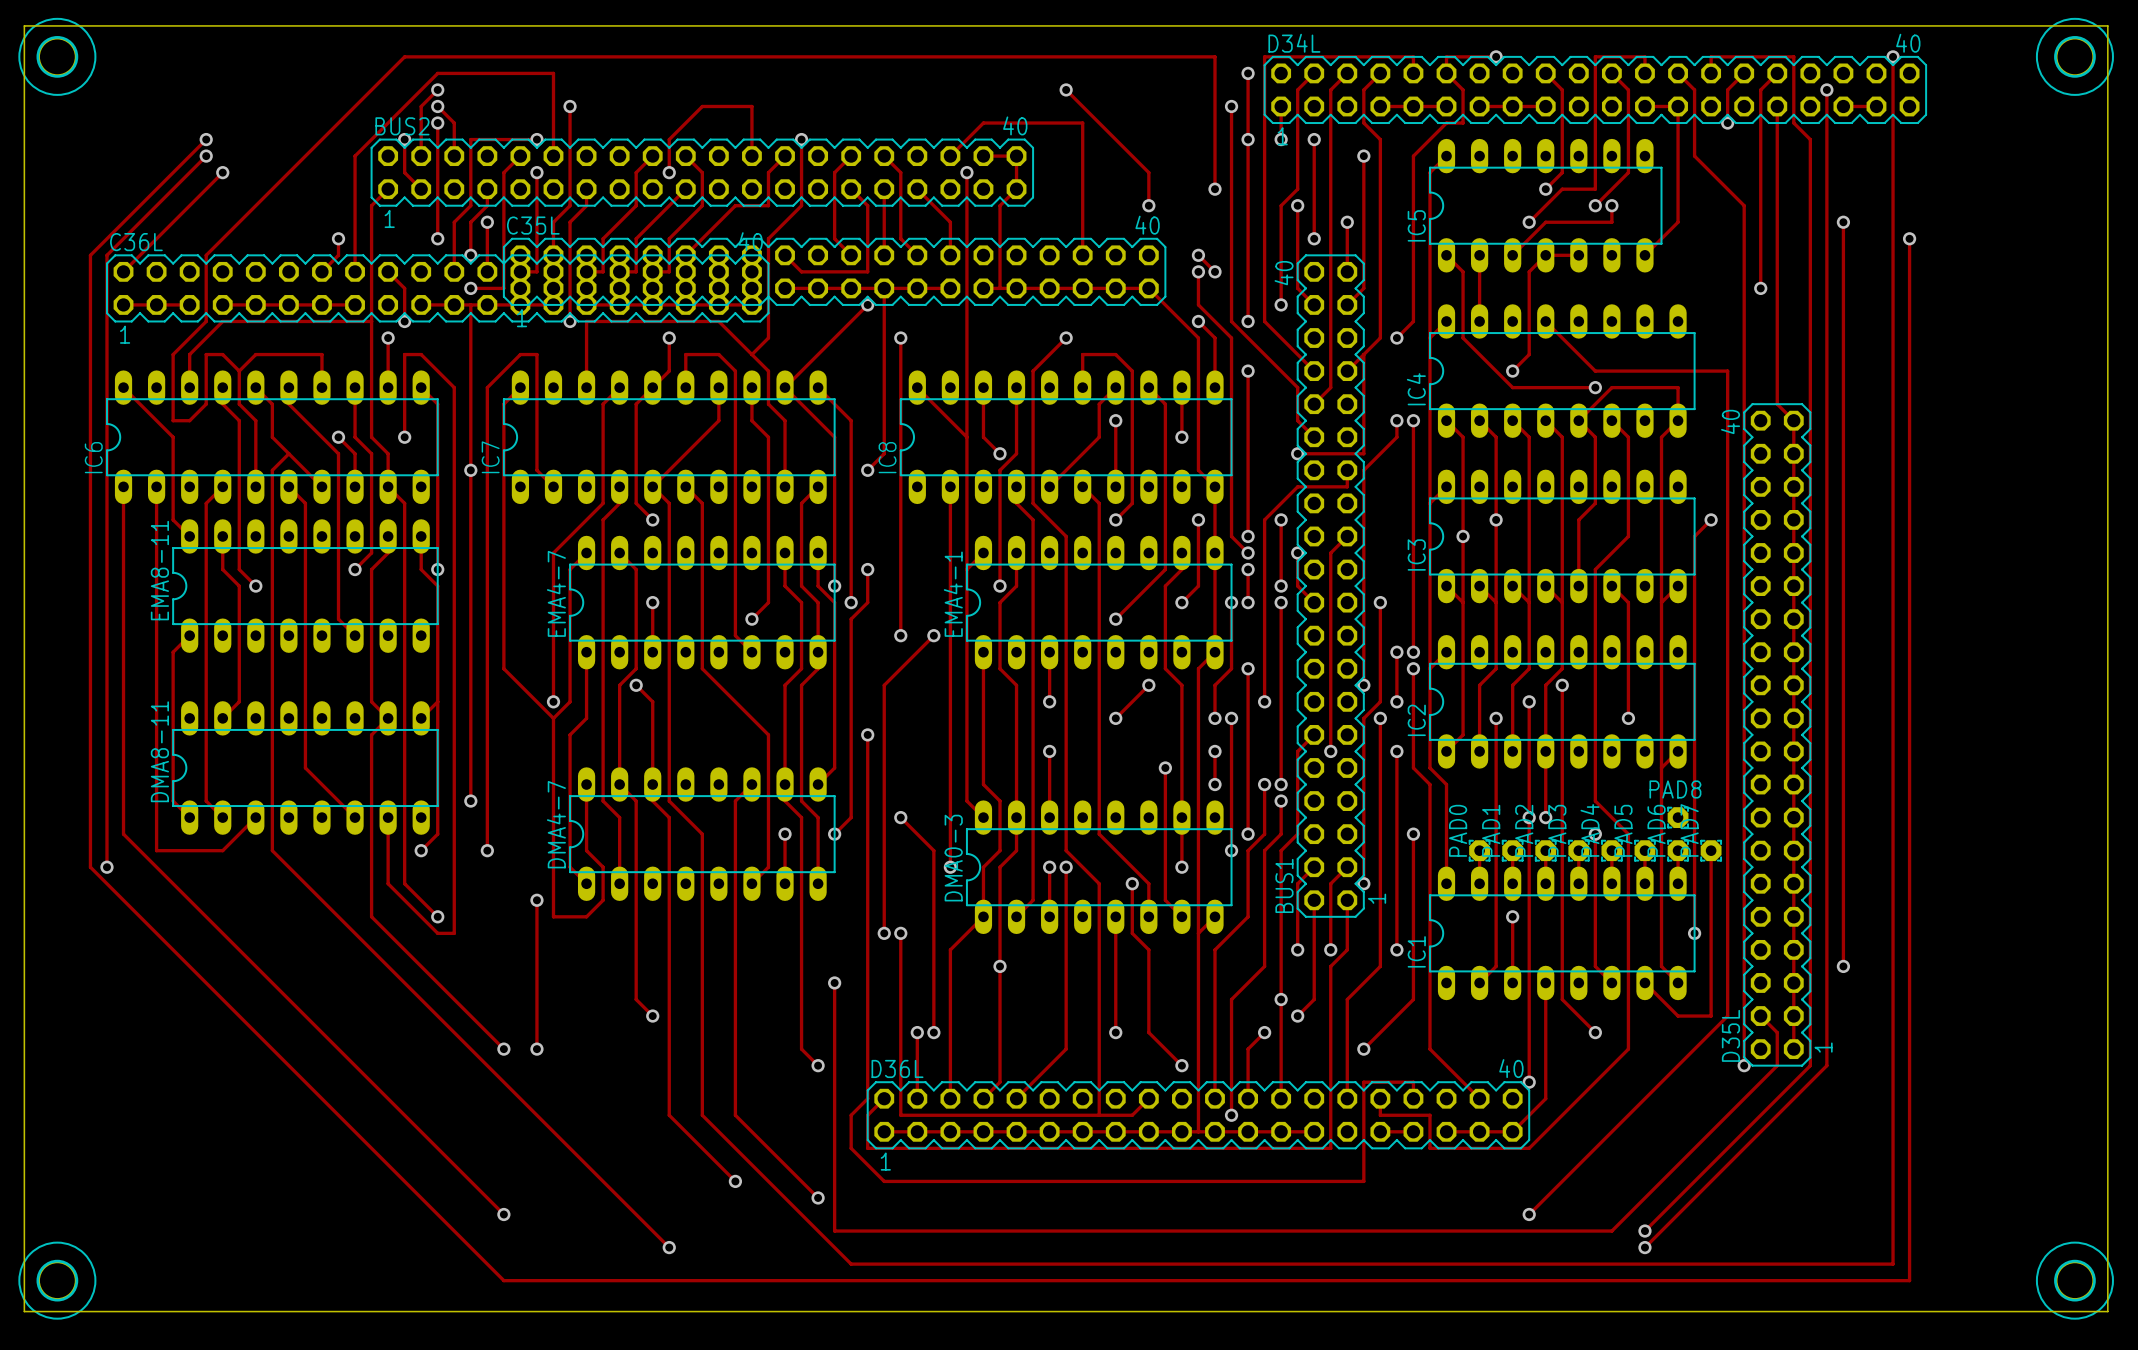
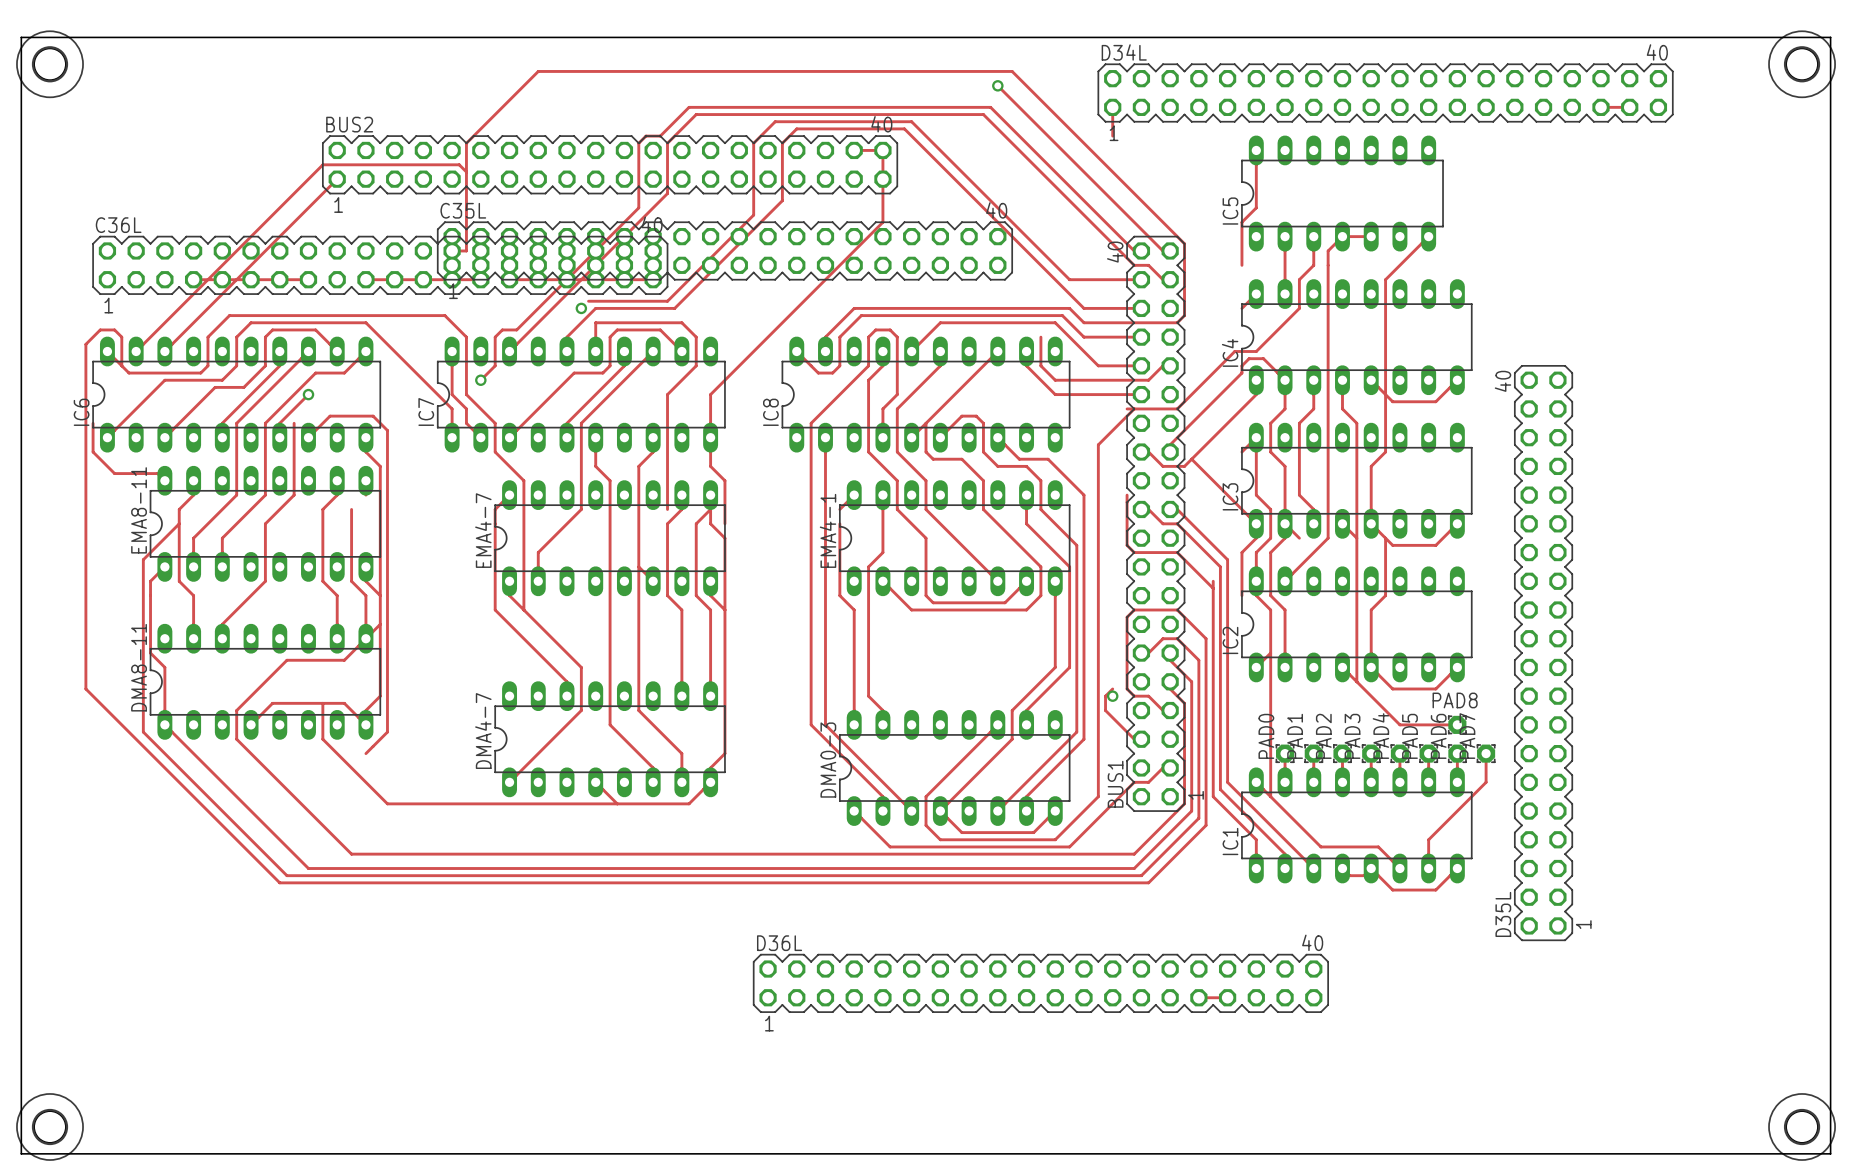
track: (1496, 56) (1446, 56) (1446, 73) (1463, 89) (1463, 123) (1446, 123) (1413, 156) (1413, 321) (1396, 338) -> none
via: (1496, 56) -> none
track: (1893, 56) (1893, 1264) (851, 1264) (702, 1115) (702, 834) (669, 801) -> (509, 782) (581, 710)
via: (1893, 56) -> none
track: (1248, 73) (1248, 321) -> none
via: (1248, 73) -> none
track: (1314, 73) (1297, 89) (1297, 189) (1281, 205) (1281, 304) -> none
track: (1347, 73) (1330, 89) (1330, 387) (1314, 404) -> (969, 322) (1055, 322) (1098, 365) (1141, 365)
track: (1380, 73) (1363, 89) (1363, 123) (1380, 139) (1380, 338) (1347, 371) -> none
track: (1413, 73) (1413, 56) (1264, 56) (1264, 321) (1314, 371) -> none
track: (1545, 73) (1562, 89) (1562, 172) (1545, 189) -> none
track: (1611, 73) (1628, 89) (1628, 172) (1595, 205) -> none
track: (1644, 73) (1644, 56) (1595, 56) (1595, 189) (1562, 189) (1529, 222) -> none
track: (1678, 73) (1694, 89) (1694, 156) (1744, 205) (1744, 1065) -> none
track: (1711, 73) (1711, 56) (1793, 56) (1793, 123) (1810, 139) (1810, 1065) (1644, 1231) -> none
track: (1744, 73) (1727, 89) (1727, 123) -> none
track: (1777, 73) (1760, 89) (1760, 288) -> none
via: none -> (997, 85)
track: (437, 89) (421, 106) (421, 156) -> none
via: (437, 89) -> none
track: (1066, 89) (1148, 172) (1148, 205) -> none
via: (1066, 89) -> none
track: (1826, 89) (1826, 1065) (1644, 1247) -> none
via: (1826, 89) -> none
track: (437, 106) (454, 123) (454, 156) -> none
via: (437, 106) -> none
track: (570, 106) (570, 205) (553, 222) (553, 255) -> none
via: (570, 106) -> none
track: (1231, 106) (1231, 321) -> (782, 164) (782, 143) (796, 128) (904, 128) (1069, 294)
via: (1231, 106) -> none
track: (1380, 106) (1446, 106) -> (1083, 308) (1141, 308)
track: (1479, 106) (1545, 106) -> none
track: (1644, 106) (1678, 106) (1678, 222) (1644, 255) -> (1443, 394) (1435, 401) (1392, 401) (1385, 394) (1385, 279) (1428, 236)
track: (1777, 106) (1777, 404) (1793, 420) (1793, 1049) -> none
track: (437, 123) (437, 238) -> none
via: (437, 123) -> none
track: (983, 123) (950, 156) -> (854, 121) (775, 121) (753, 143) (753, 193)
track: (1049, 123) (1082, 123) (1082, 255) -> (911, 121) (1069, 279) (1141, 279)
via: (1727, 123) -> none
track: (206, 139) (90, 255) (90, 867) (503, 1280) (1909, 1280) (1909, 238) -> none
via: (206, 139) -> none
track: (404, 139) (404, 172) (421, 189) -> none
via: (404, 139) -> none
track: (536, 139) (470, 139) (470, 205) (454, 222) (454, 271) -> none
via: (536, 139) -> none
track: (801, 139) (801, 205) (768, 238) (768, 338) (751, 354) -> none
via: (801, 139) -> none
via: (1248, 139) -> none
via: (1281, 139) -> none
track: (1314, 139) (1314, 238) -> none
via: (1314, 139) -> none
track: (206, 156) (106, 255) (106, 470) -> none
via: (206, 156) -> none
track: (520, 156) (503, 172) (503, 288) (470, 288) -> none
track: (553, 156) (553, 73) (437, 73) (355, 156) (355, 271) -> none
track: (652, 156) (636, 172) (636, 205) (603, 238) (603, 271) (586, 271) -> none
track: (685, 156) (702, 172) (702, 205) (669, 238) (669, 271) (652, 271) -> none
track: (751, 156) (751, 106) (702, 106) (669, 139) (669, 172) -> none
track: (785, 156) (768, 172) -> (1170, 279) (1162, 279) (1148, 265) (1134, 265) (983, 114) (696, 114) (667, 143) (667, 164)
track: (851, 156) (834, 172) (834, 238) (851, 255) -> none
track: (884, 156) (900, 172) -> none
track: (1363, 156) (1363, 263) -> (466, 164) (466, 143) (538, 71) (1012, 71) (1184, 243)
via: (1363, 156) -> none
track: (1446, 156) (1429, 172) (1429, 238) -> (1256, 150) (1256, 207) (1241, 222)
track: (222, 172) (123, 271) -> none
via: (222, 172) -> none
via: (536, 172) -> none
via: (669, 172) -> none
track: (966, 172) (966, 371) -> (1141, 337) (1083, 337) (1062, 315) (861, 315) (839, 337)
via: (966, 172) -> none
track: (487, 189) (487, 205) (470, 222) (470, 255) -> none
track: (586, 189) (586, 205) (570, 222) (570, 321) -> none
track: (685, 189) (636, 238) (636, 271) (619, 271) -> none
track: (851, 189) (867, 205) -> none
track: (884, 189) (884, 255) -> none
track: (917, 189) (950, 222) (950, 255) -> none
track: (1016, 189) (1000, 205) (1000, 288) -> none
track: (1214, 189) (1214, 56) (404, 56) (206, 255) (206, 321) (173, 354) (173, 420) (189, 420) (206, 404) (206, 354) (222, 354) (239, 371) -> none
via: (1214, 189) -> none
via: (1545, 189) -> none
track: (371, 205) (371, 437) (388, 453) (388, 486) (404, 503) (404, 569) -> (322, 193) (164, 351)
track: (768, 205) (735, 205) (685, 255) -> (667, 193) (509, 351)
via: (1148, 205) -> none
track: (1297, 205) (1297, 288) (1314, 304) -> none
via: (1297, 205) -> none
via: (1595, 205) -> none
track: (1611, 205) (1611, 222) (1545, 222) (1512, 255) -> none
via: (1611, 205) -> none
track: (900, 213) (900, 238) (917, 255) -> (782, 200) (674, 308) (595, 308) (566, 337) (566, 351)
track: (487, 222) (487, 271) -> none
via: (487, 222) -> none
track: (1347, 222) (1347, 271) -> (997, 85) (1162, 250) (1170, 250)
via: (1347, 222) -> none
via: (1529, 222) -> none
track: (1843, 222) (1843, 966) -> none
via: (1843, 222) -> none
track: (867, 230) (867, 271) (801, 271) (785, 255) -> (753, 215) (667, 301) (588, 301)
track: (338, 238) (338, 255) (321, 271) -> none
via: (338, 238) -> none
via: (437, 238) -> none
via: (1314, 238) -> none
via: (1909, 238) -> none
via: (470, 255) -> none
track: (1198, 255) (1214, 271) -> none
via: (1198, 255) -> none
track: (1446, 255) (1463, 271) (1463, 338) (1512, 387) (1595, 387) -> none
track: (388, 271) (404, 288) (404, 321) -> none
track: (1198, 271) (1198, 304) (1231, 338) (1231, 536) -> (997, 437) (1019, 459) (1048, 459) (1069, 480)
via: (1198, 271) -> none
via: (1214, 271) -> none
track: none -> (1141, 250) (1134, 250) (990, 107) (689, 107) (660, 136) (645, 136) (638, 143) (638, 207) (516, 329) (502, 329) (495, 337) (495, 365) (480, 380)
via: (470, 288) -> none
track: (785, 288) (950, 288) -> none
track: (884, 288) (884, 453) (867, 470) -> none
track: (983, 288) (1148, 288) (1198, 338) (1198, 371) -> none
track: (1363, 288) (1347, 304) -> (1184, 265) (1184, 315) (1177, 322) (1083, 322) (1069, 308) (854, 308) (825, 337) (825, 351)
track: (1429, 288) (1429, 404) -> none
via: (1760, 288) -> none
track: (123, 304) (189, 304) -> none
track: (470, 304) (470, 801) -> none
track: (867, 304) (785, 387) (834, 437) (834, 536) -> (882, 179) (882, 222) (710, 394) (710, 466) (724, 480)
via: (867, 304) -> none
via: (1281, 304) -> none
track: (222, 321) (371, 321) -> (193, 294) (322, 164) (459, 164) (466, 171)
via: (404, 321) -> none
via: (570, 321) -> none
track: (1198, 321) (1214, 338) (1214, 387) -> none
via: (1198, 321) -> none
via: (1248, 321) -> none
track: (1545, 321) (1595, 371) (1727, 371) (1727, 1016) (1529, 1214) -> none
track: (388, 338) (388, 387) -> (164, 437) (215, 387) (243, 387) (265, 365) (265, 337) (272, 329) (315, 329) (337, 351)
via: (388, 338) -> none
track: (669, 338) (669, 371) (636, 404) (636, 503) (652, 519) -> none
track: (900, 338) (900, 635) -> none
via: (900, 338) -> none
track: (1066, 338) (1033, 371) -> none
via: (1066, 338) -> none
track: (1248, 338) (1297, 387) (1297, 420) (1314, 437) -> (1026, 365) (1055, 394) (1141, 394)
via: (1396, 338) -> none
track: (189, 354) (189, 387) -> (164, 322) (136, 351)
track: (255, 354) (288, 354) -> (107, 437) (164, 380) (222, 380) (236, 365) (236, 337) (251, 322)
track: (321, 354) (321, 387) -> (279, 322) (351, 322)
track: (404, 354) (404, 437) -> none
track: (718, 354) (735, 371) (735, 519) -> (653, 437) (653, 452) (638, 466)
track: (1082, 354) (1082, 387) -> (940, 322) (911, 351)
track: (1115, 354) (1132, 371) (1132, 470) -> (940, 437) (961, 416) (976, 416) (983, 423)
track: (1363, 354) (1363, 453) (1355, 453) -> (1313, 236) (1313, 265) (1299, 279) (1299, 308) (1256, 351) (1234, 351) (1177, 408)
track: (1529, 354) (1512, 371) -> (1328, 322) (1328, 394)
track: (760, 362) (718, 321) (586, 321) (586, 387) -> (660, 329) (617, 329) (610, 337) (610, 365) (602, 373) (574, 373) (509, 437)
track: (536, 371) (536, 354) (520, 354) (487, 387) (487, 850) -> (466, 337) (444, 315) (229, 315) (222, 322)
track: (768, 371) (768, 404) (785, 420) (785, 486) -> (667, 337) (681, 351)
track: (1248, 371) (1248, 536) -> none
via: (1248, 371) -> none
via: (1512, 371) -> none
track: (222, 387) (222, 404) (239, 420) (239, 569) (255, 586) -> none
track: (255, 387) (272, 404) (272, 437) (321, 486) -> (308, 394) (279, 423) (279, 437)
track: (288, 387) (288, 404) (338, 453) (338, 470) -> none
track: (355, 387) (355, 437) (371, 453) (371, 553) (355, 569) -> (308, 351) (251, 408)
track: (421, 387) (437, 404) (437, 519) -> (365, 437) (365, 452) (380, 466)
track: (454, 387) (454, 933) (437, 933) (388, 883) (388, 817) -> (394, 351) (452, 408) (452, 437)
track: (520, 387) (503, 404) (503, 668) (553, 718) -> none
track: (619, 387) (603, 404) (603, 503) (553, 553) (553, 701) -> none
track: (751, 387) (751, 420) (768, 437) -> (624, 322) (681, 322) (696, 337) (696, 365) (667, 394)
track: (818, 387) (851, 420) (851, 602) -> none
track: (983, 387) (983, 437) (1000, 453) -> none
track: none -> (940, 351) (940, 365) (897, 408)
track: (1115, 387) (1099, 404) (1099, 437) -> (997, 351) (954, 394)
track: (1148, 387) (1165, 404) (1165, 569) (1115, 619) -> none
via: (1595, 387) -> none
track: (239, 404) (255, 420) (255, 470) -> (279, 351) (279, 365) (222, 423)
track: none -> (207, 365) (200, 373) (128, 373)
track: (718, 404) (718, 420) -> (653, 351) (624, 380)
track: none -> (624, 365) (566, 423) (566, 437)
track: (966, 404) (966, 586) -> none
track: (1016, 404) (1016, 453) (1000, 470) -> (882, 365) (868, 380) (868, 423)
track: (1181, 404) (1181, 437) -> none
track: (1198, 404) (1198, 470) (1214, 486) (1214, 652) (1198, 668) (1198, 1131) -> (1040, 365) (1055, 380) (1148, 380) (1162, 365) (1170, 365)
track: (148, 412) (173, 437) (173, 519) (181, 528) -> (93, 452) (114, 473) (157, 473)
track: (942, 412) (966, 437) -> (818, 373) (832, 373) (839, 365)
track: (1429, 412) (1429, 619) -> (1191, 459) (1256, 523) (1256, 538) (1241, 552)
track: none -> (1241, 373) (1170, 444) (1170, 452)
via: none -> (480, 380)
track: (1115, 420) (1115, 486) -> none
via: (1115, 420) -> none
track: (1396, 420) (1396, 437) (1363, 470) (1363, 685) -> none
via: (1396, 420) -> none
track: (1413, 420) (1413, 627) -> (1170, 509) (1177, 509) (1227, 559)
via: (1413, 420) -> none
track: (1446, 420) (1463, 437) (1463, 470) -> (1241, 365) (1249, 358) (1263, 358) (1285, 380) (1285, 408) (1270, 423)
track: none -> (1256, 380) (1256, 394) (1184, 466) (1162, 466) (1148, 452) (1141, 452)
track: (1479, 420) (1496, 437) (1496, 470) -> (1313, 380) (1313, 408) (1299, 423)
track: (1512, 420) (1529, 437) -> none
track: (1545, 420) (1562, 437) (1562, 470) -> (1342, 380) (1342, 408) (1356, 423)
track: (1578, 420) (1611, 387) (1678, 387) (1678, 420) -> none
track: (1611, 420) (1628, 437) (1628, 536) (1595, 569) (1595, 602) -> none
track: (338, 437) (355, 453) (355, 486) -> (380, 739) (387, 732) (387, 430) (373, 416) (330, 416) (308, 437)
via position: (338, 437) -> (308, 394)
via: (404, 437) -> none
track: (536, 437) (536, 453) -> (452, 351) (452, 394) (466, 408)
track: (1033, 437) (1033, 453) -> (897, 394) (882, 408) (882, 437)
via: (1181, 437) -> none
track: (1661, 437) (1661, 966) (1678, 982) -> none
via: (1000, 453) -> none
via: (1297, 453) -> none
via: (470, 470) -> none
track: (669, 470) (652, 486) (669, 503) -> (581, 423) (581, 452)
via: (867, 470) -> none
track: none -> (926, 423) (926, 452) (933, 459) (961, 459) (983, 480) (983, 509) (1040, 566) (1040, 595) (1026, 610) (911, 610) (882, 581)
track: (1347, 470) (1347, 486) (1297, 486) (1264, 519) -> (1134, 408) (1098, 444) (1098, 466)
track: (123, 486) (123, 834) (503, 1214) -> none
track: (156, 486) (156, 850) (222, 850) (255, 817) -> none
track: (222, 486) (206, 503) (206, 569) -> (193, 495) (179, 509)
track: (288, 486) (305, 503) -> (365, 351) (344, 373) (315, 373) (265, 423) (265, 452)
track: (619, 486) (619, 503) (603, 519) (603, 536) -> (466, 394) (495, 423) (495, 452) (523, 480)
track: (685, 486) (702, 503) (702, 536) -> (595, 437) (595, 466) (610, 480)
track: (818, 486) (801, 503) (801, 586) (818, 602) (818, 652) -> none
track: (1016, 486) (1016, 503) (1033, 519) (1033, 536) -> (868, 452) (897, 480)
track: (1082, 486) (1099, 503) (1099, 834) (1148, 883) (1148, 916) -> (1040, 509) (1076, 545) (1076, 732) (997, 811)
track: (106, 503) (106, 867) -> none
track: (1000, 503) (1000, 586) -> none
track: (1132, 503) (1115, 519) -> none
track: (1463, 503) (1463, 569) -> (1256, 437) (1256, 495) (1270, 509)
via: (652, 519) -> none
via: (1115, 519) -> none
track: (1198, 519) (1198, 536) -> (983, 452) (997, 466) (1026, 466) (1040, 480)
via: (1198, 519) -> none
track: (1281, 519) (1281, 586) -> (1083, 538) (1083, 595)
via: (1281, 519) -> none
via: (1496, 519) -> none
track: (1711, 519) (1694, 536) (1694, 933) -> none
via: (1711, 519) -> none
via: (1248, 536) -> none
track: (1347, 536) (1330, 553) (1330, 751) -> none
via: (1463, 536) -> none
track: (222, 553) (222, 569) (239, 586) (239, 701) (222, 718) -> none
track: (272, 553) (272, 801) -> (351, 581) (365, 595) (365, 638) (344, 660) (286, 660) (236, 710)
track: none -> (236, 495) (193, 538) (193, 566)
track: (305, 553) (305, 586) -> (294, 495) (265, 523)
track: none -> (265, 495) (222, 538) (222, 566)
track: (338, 553) (338, 619) (355, 635) -> none
track: (421, 553) (421, 569) (437, 586) -> (380, 509) (380, 523)
track: (619, 553) (636, 569) (636, 668) (619, 685) (619, 784) (636, 801) (636, 999) (652, 1016) -> none
track: none -> (1083, 495) (1083, 509)
via: (1248, 553) -> none
via: (1297, 553) -> none
track: (1496, 553) (1496, 668) (1479, 685) -> (1299, 495) (1313, 509) (1313, 523)
via: (355, 569) -> none
via: (437, 569) -> none
track: (669, 569) (669, 751) -> (581, 509) (538, 552) (538, 581)
track: (768, 569) (768, 586) -> (681, 509) (667, 523)
track: (785, 569) (785, 586) (801, 602) -> (710, 509) (696, 523) (696, 538)
track: (867, 569) (867, 602) (851, 619) (851, 817) (834, 834) -> none
via: (867, 569) -> none
track: (1033, 569) (1033, 900) (1016, 916) -> (897, 337) (890, 329) (875, 329) (868, 337) (868, 365) (811, 423) (811, 724) (882, 796) (882, 811)
track: (1066, 569) (1066, 602) -> (897, 509) (926, 538)
track: none -> (926, 509) (997, 581)
track: (1181, 569) (1165, 586) (1165, 668) (1181, 685) (1181, 801) -> none
track: (1198, 569) (1198, 586) (1181, 602) -> none
via: (1248, 569) -> none
via: (255, 586) -> none
via: (834, 586) -> none
via: (1000, 586) -> none
track: (1016, 586) (1000, 602) (1000, 635) -> (882, 523) (882, 552) (868, 566)
via: (1281, 586) -> none
track: (1297, 586) (1314, 602) -> (1127, 523) (1127, 545) (1134, 552) (1177, 552) (1213, 588)
track: (1446, 586) (1463, 602) (1463, 619) -> (1270, 452) (1285, 466) (1285, 538) (1270, 552)
track: (1512, 586) (1529, 602) (1529, 668) (1512, 685) (1512, 751) -> none
track: none -> (1371, 523) (1392, 545) (1435, 545) (1443, 538)
track: (1611, 586) (1628, 602) (1628, 718) -> none
track: (652, 602) (652, 652) -> none
via: (652, 602) -> none
track: (768, 602) (751, 619) -> none
via: (851, 602) -> none
via: (1181, 602) -> none
track: (1231, 602) (1231, 635) -> (1026, 509) (1026, 523) (1069, 566)
via: (1231, 602) -> none
via: (1248, 602) -> none
track: (1281, 602) (1281, 784) -> none
via: (1281, 602) -> none
track: (1380, 602) (1380, 701) (1363, 718) (1363, 792) -> (1170, 681) (1170, 688) (1184, 703)
via: (1380, 602) -> none
track: none -> (1270, 538) (1256, 552) (1256, 595) (1270, 610)
track: none -> (1328, 538) (1285, 581)
via: (751, 619) -> none
via: (1115, 619) -> none
track: none -> (365, 566) (365, 581) (380, 595)
via: (900, 635) -> none
track: (933, 635) (884, 685) (884, 933) -> none
via: (933, 635) -> none
track: (206, 652) (206, 801) (222, 817) -> (179, 581) (193, 595) (193, 638)
track: (305, 652) (305, 767) (355, 817) -> (265, 581) (222, 624) (222, 638)
track: (371, 652) (371, 701) (388, 718) (371, 734) (371, 792) -> (322, 581) (337, 595) (337, 638)
track: (404, 652) (404, 883) (437, 916) -> none
track: (983, 652) (983, 685) -> (839, 595) (854, 610)
track: (1049, 652) (1049, 701) -> none
via: (1396, 652) -> none
track: none -> (1227, 581) (1227, 595)
via: (1413, 652) -> none
track: (1446, 652) (1429, 668) (1429, 767) (1446, 784) (1446, 883) -> none
track: (586, 668) (586, 718) (570, 734) (570, 867) (586, 883) -> (509, 595) (581, 667)
track: (702, 668) (768, 734) (768, 867) (751, 883) -> (610, 595) (610, 724) (653, 767) (653, 782)
track: (801, 668) (785, 685) -> (667, 538) (667, 595) (681, 610)
track: none -> (696, 595) (710, 610) (710, 696)
track: (818, 668) (801, 685) (801, 801) (818, 817) (818, 867) -> (710, 595) (724, 610)
track: (966, 668) (966, 801) (983, 817) -> (854, 696) (854, 724)
track: (1000, 668) (1016, 685) (1016, 801) -> (868, 595) (868, 696) (882, 710)
track: (1066, 668) (1066, 850) (1099, 883) (1099, 1115) -> (926, 595) (933, 602) (1005, 602) (1026, 581)
track: (1231, 668) (1214, 685) -> (1055, 581) (1055, 610)
via: (1248, 668) -> none
via: (1413, 668) -> none
track: (1463, 668) (1463, 685) -> (1270, 595) (1285, 610)
track: (1562, 668) (1545, 685) (1545, 817) -> (1356, 595) (1356, 610)
track: (1595, 668) (1595, 801) -> (1385, 595) (1371, 610) (1371, 667) (1392, 688) (1435, 688) (1443, 681)
track: (570, 685) (570, 701) (553, 718) -> none
track: (603, 685) (603, 801) (619, 817) (619, 883) -> none
track: (636, 685) (652, 701) (652, 767) -> (495, 610) (566, 681)
via: (636, 685) -> none
track: (1148, 685) (1115, 718) -> none
via: (1148, 685) -> none
via: (1363, 685) -> none
via: (1562, 685) -> none
via: (553, 701) -> none
via: (1049, 701) -> none
track: none -> (1098, 624) (1098, 696)
via: (1264, 701) -> none
via: (1396, 701) -> none
track: (1529, 701) (1529, 1082) -> none
via: (1529, 701) -> none
track: (553, 718) (553, 916) (586, 916) (603, 900) (603, 867) (586, 850) (586, 784) -> none
via: (1115, 718) -> none
via: (1214, 718) -> none
via: (1231, 718) -> none
track: (1380, 718) (1380, 743) -> (1141, 653) (1148, 653) (1162, 638) (1177, 638) (1198, 660)
via: (1380, 718) -> none
track: (1496, 718) (1496, 966) (1479, 982) -> (1141, 509) (1148, 509) (1162, 523) (1177, 523) (1220, 566) (1220, 789) (1285, 854) (1285, 868)
via: (1496, 718) -> none
via: (1628, 718) -> none
track: (173, 734) (173, 801) (189, 817) -> (150, 653) (164, 667) (164, 724) (308, 868) (1134, 868) (1191, 811) (1191, 681) (1170, 660) (1170, 653)
track: (867, 734) (867, 1098) (851, 1115) (851, 1148) (884, 1181) (1363, 1181) (1363, 1082) (1413, 1082) (1413, 1098) -> none
via: (867, 734) -> none
track: (1314, 734) (1297, 751) -> (121, 365) (121, 337) (114, 329) (100, 329) (85, 344) (85, 688) (279, 882) (1148, 882) (1206, 825) (1206, 638) (1177, 610) (1134, 610) (1127, 617) (1127, 667)
track: none -> (1270, 653) (1270, 796)
track: (1049, 751) (1049, 817) -> none
via: (1049, 751) -> none
track: (1214, 751) (1214, 784) -> none
via: (1214, 751) -> none
track: (1231, 751) (1231, 850) -> (1069, 667) (1026, 710)
via: (1330, 751) -> none
via: (1396, 751) -> none
track: none -> (1342, 667) (1385, 710)
track: (834, 767) (818, 784) -> (724, 681) (724, 753) (710, 767)
track: (1165, 767) (1165, 801) -> (1055, 638) (1055, 667) (1012, 710)
via: (1165, 767) -> none
track: (1413, 767) (1429, 784) (1429, 1049) (1479, 1098) -> (1227, 681) (1227, 739)
track: (1562, 767) (1562, 999) (1595, 1032) -> none
track: none -> (1112, 688) (1105, 696) (1105, 710) (1134, 739) (1141, 739)
track: (1297, 776) (1297, 834) (1281, 850) (1281, 1098) -> (1127, 688) (1134, 696) (1148, 696) (1162, 710) (1170, 710)
track: (437, 784) (437, 834) -> (380, 696) (365, 710) (365, 724) (344, 703) (272, 703) (251, 724)
track: (652, 784) (652, 801) (669, 817) (669, 1115) (735, 1181) -> none
track: (751, 784) (735, 801) (735, 1115) (818, 1197) -> none
track: (785, 784) (785, 801) (801, 817) (801, 1049) (818, 1065) -> none
track: (983, 784) (1000, 801) (1000, 850) (983, 867) (983, 916) (950, 949) (950, 1098) -> none
via: (1214, 784) -> none
via: (1264, 784) -> none
via: (470, 801) -> none
track: (1281, 801) (1281, 834) (1264, 850) -> (1098, 739) (1098, 753)
via: (1281, 801) -> none
track: (900, 817) (933, 850) (933, 1032) -> none
via: (900, 817) -> none
track: (950, 817) (950, 867) -> (825, 724) (911, 811)
track: (1016, 817) (1016, 850) (1000, 867) (1000, 1082) (983, 1098) -> none
track: (1181, 817) (1181, 867) -> (1213, 624) (1213, 667)
via: (1529, 817) -> none
via: (1545, 817) -> none
track: (1611, 817) (1628, 834) (1628, 1049) (1529, 1148) (1429, 1148) (1429, 1115) (1380, 1115) (1380, 1098) -> (1399, 724) (1457, 724)
track: (272, 834) (272, 850) (669, 1247) -> (236, 739) (351, 854) (1134, 854) (1184, 803) (1184, 782)
track: (371, 834) (371, 916) (503, 1049) -> (322, 739) (387, 803) (689, 803) (710, 782)
track: (785, 834) (785, 850) -> (638, 566) (638, 710) (681, 753)
via: (785, 834) -> none
via: (834, 834) -> none
track: (1165, 834) (1165, 900) (1181, 916) -> (1012, 739) (940, 811) (961, 832) (1033, 832) (1040, 825)
track: none -> (1083, 739) (1026, 796) (1026, 811)
via: (1248, 834) -> none
track: (1264, 834) (1248, 850) (1248, 916) -> (1098, 796) (1083, 811)
via: (1413, 834) -> none
track: (1595, 834) (1595, 966) -> (1256, 782) (1320, 846) (1378, 846) (1385, 854)
via: (1595, 834) -> none
via: (421, 850) -> none
via: (487, 850) -> none
via: (1231, 850) -> none
via: (106, 867) -> none
via: (950, 867) -> none
track: (1049, 867) (1049, 916) -> (1069, 595) (1069, 638)
via: (1049, 867) -> none
track: (1066, 867) (1066, 900) -> (997, 724) (926, 796)
via: (1066, 867) -> none
via: (1181, 867) -> none
track: (1314, 867) (1297, 883) (1297, 949) -> none
track: (1347, 867) (1330, 883) (1330, 949) -> (1170, 767) (1162, 767) (1148, 782) (1134, 782) (1069, 846) (890, 846) (854, 811)
track: none -> (595, 782) (617, 803)
track: (1132, 883) (1132, 933) (1148, 949) (1148, 1032) (1181, 1065) -> none
via: (1132, 883) -> none
via: (1363, 883) -> none
track: (1413, 883) (1413, 999) (1363, 1049) -> none
track: (1711, 883) (1711, 1016) (1678, 1016) (1644, 982) -> (1486, 782) (1428, 839) (1428, 868)
track: (536, 900) (536, 1049) -> none
via: (536, 900) -> none
track: (1264, 900) (1264, 966) (1231, 999) (1231, 1115) -> none
track: (1314, 900) (1314, 999) (1297, 1016) -> none
track: (1347, 900) (1347, 949) (1330, 966) (1330, 1148) (867, 1148) (867, 1115) (884, 1098) -> none
track: (1396, 900) (1396, 949) -> (1213, 796) (1256, 839) (1256, 868)
via: (437, 916) -> none
track: (1115, 916) (1115, 1032) -> none
track: (1512, 916) (1512, 982) -> (1227, 782) (1313, 868)
via: (1512, 916) -> none
track: (1380, 925) (1380, 966) (1347, 999) (1347, 1098) -> (1198, 818) (1141, 875) (286, 875) (143, 732) (143, 559) (179, 523)
via: (884, 933) -> none
track: (900, 933) (900, 1115) (1132, 1115) (1148, 1098) -> none
via: (900, 933) -> none
track: (1066, 933) (1066, 1049) (1016, 1098) -> none
via: (1694, 933) -> none
track: (1214, 949) (1214, 1098) -> (1055, 839) (940, 839) (926, 825)
via: (1297, 949) -> none
via: (1330, 949) -> none
via: (1396, 949) -> none
via: (1000, 966) -> none
via: (1843, 966) -> none
track: (834, 982) (834, 1231) (1611, 1231) (1777, 1065) (1777, 1032) (1760, 1016) -> none
via: (834, 982) -> none
track: (1545, 982) (1545, 1098) (1512, 1131) (1446, 1131) -> (1342, 868) (1349, 875) (1364, 875) (1371, 868) (1392, 890) (1435, 890) (1457, 868)
via: (1281, 999) -> none
via: (652, 1016) -> none
via: (1297, 1016) -> none
track: (917, 1032) (917, 1098) -> none
via: (917, 1032) -> none
via: (933, 1032) -> none
via: (1115, 1032) -> none
track: (1264, 1032) (1248, 1049) (1248, 1098) -> none
via: (1264, 1032) -> none
via: (1595, 1032) -> none
via: (503, 1049) -> none
via: (536, 1049) -> none
via: (1363, 1049) -> none
via: (818, 1065) -> none
via: (1181, 1065) -> none
via: (1744, 1065) -> none
via: (1529, 1082) -> none
via: (1231, 1115) -> none
track: (884, 1131) (1314, 1131) -> none
via: (735, 1181) -> none
via: (818, 1197) -> none
via: (503, 1214) -> none
via: (1529, 1214) -> none
via: (1644, 1231) -> none
via: (669, 1247) -> none
via: (1644, 1247) -> none

